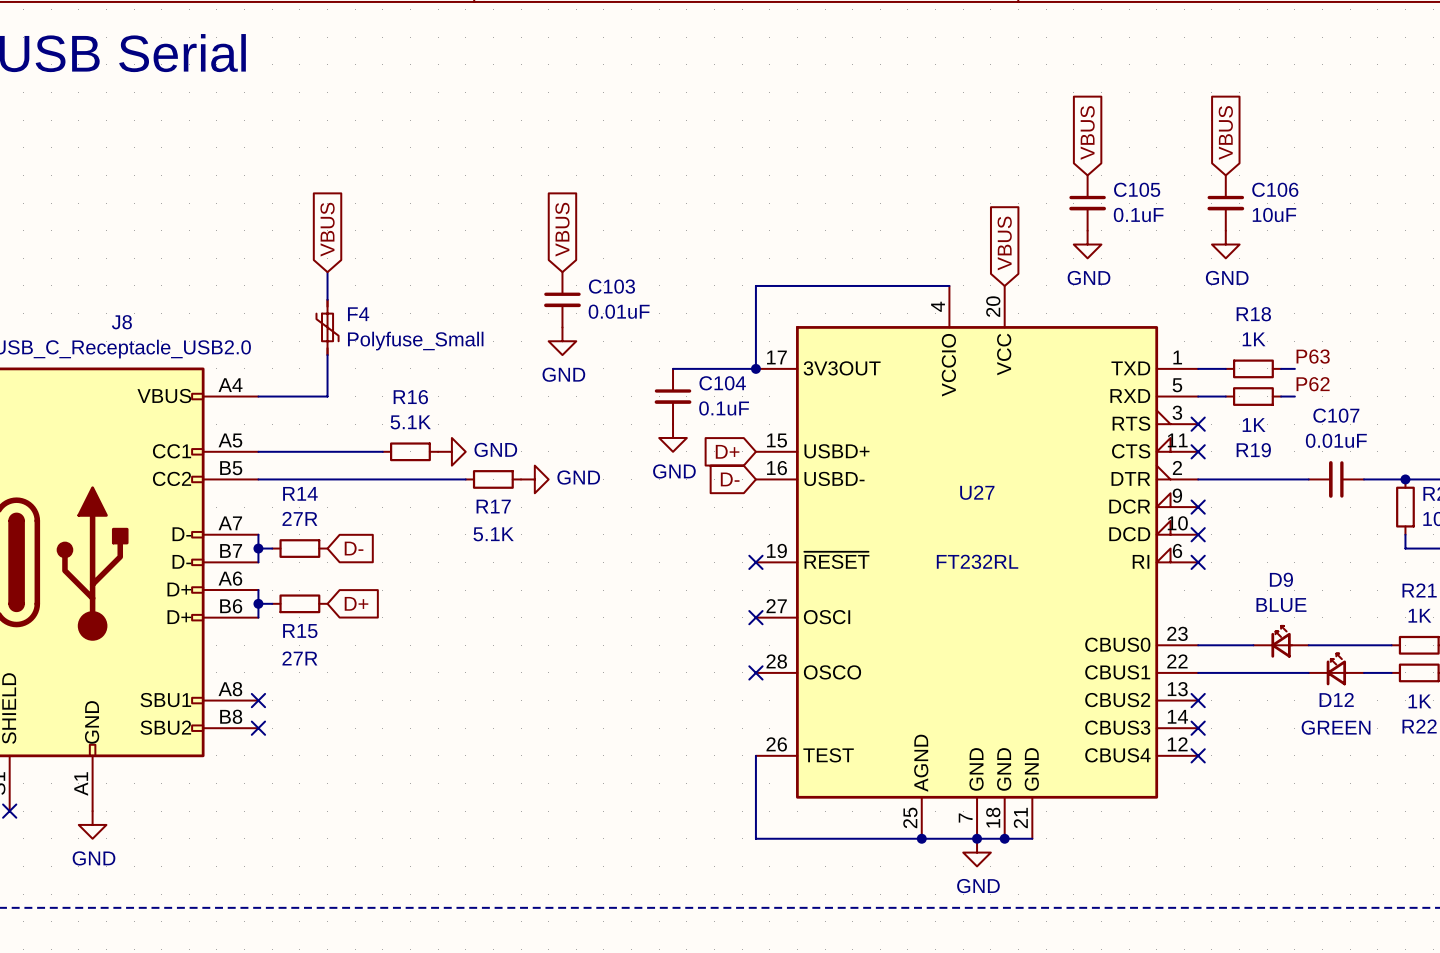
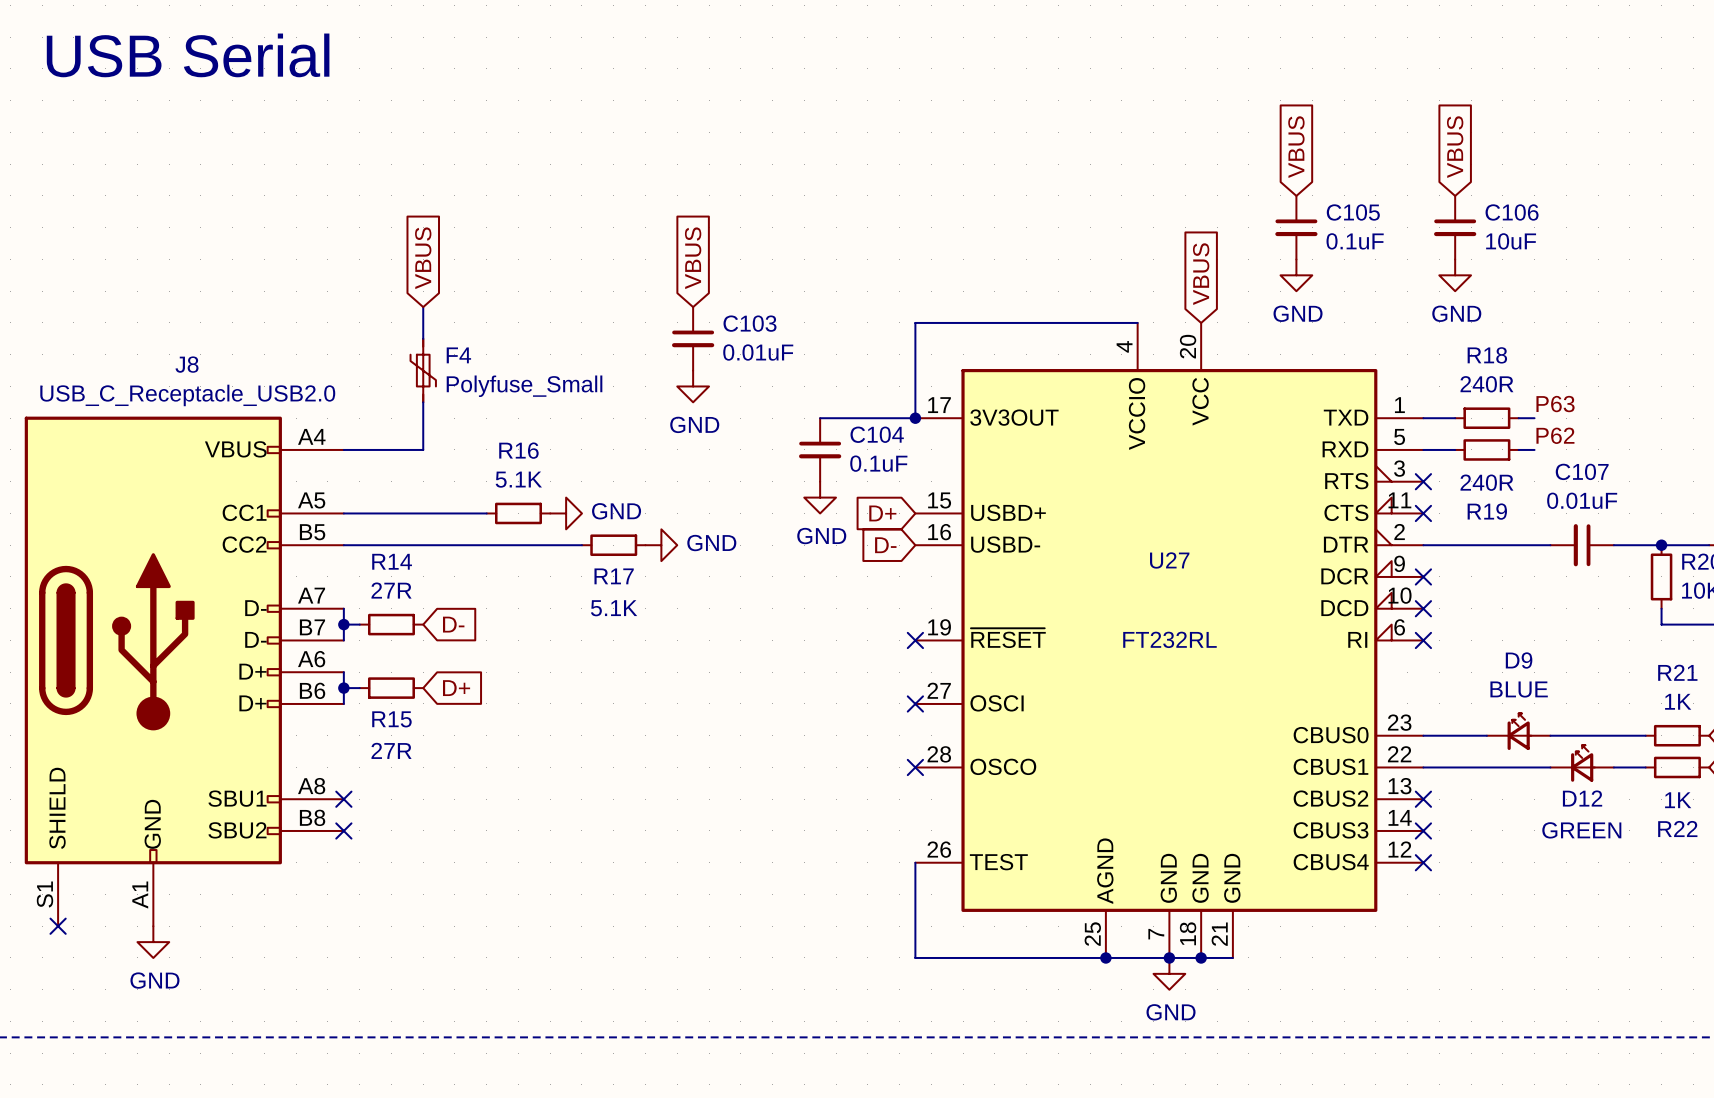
R18 value: 1K (1254, 339) -> 240R (1486, 384)
R19 value: 1K (1254, 425) -> 240R (1486, 482)

